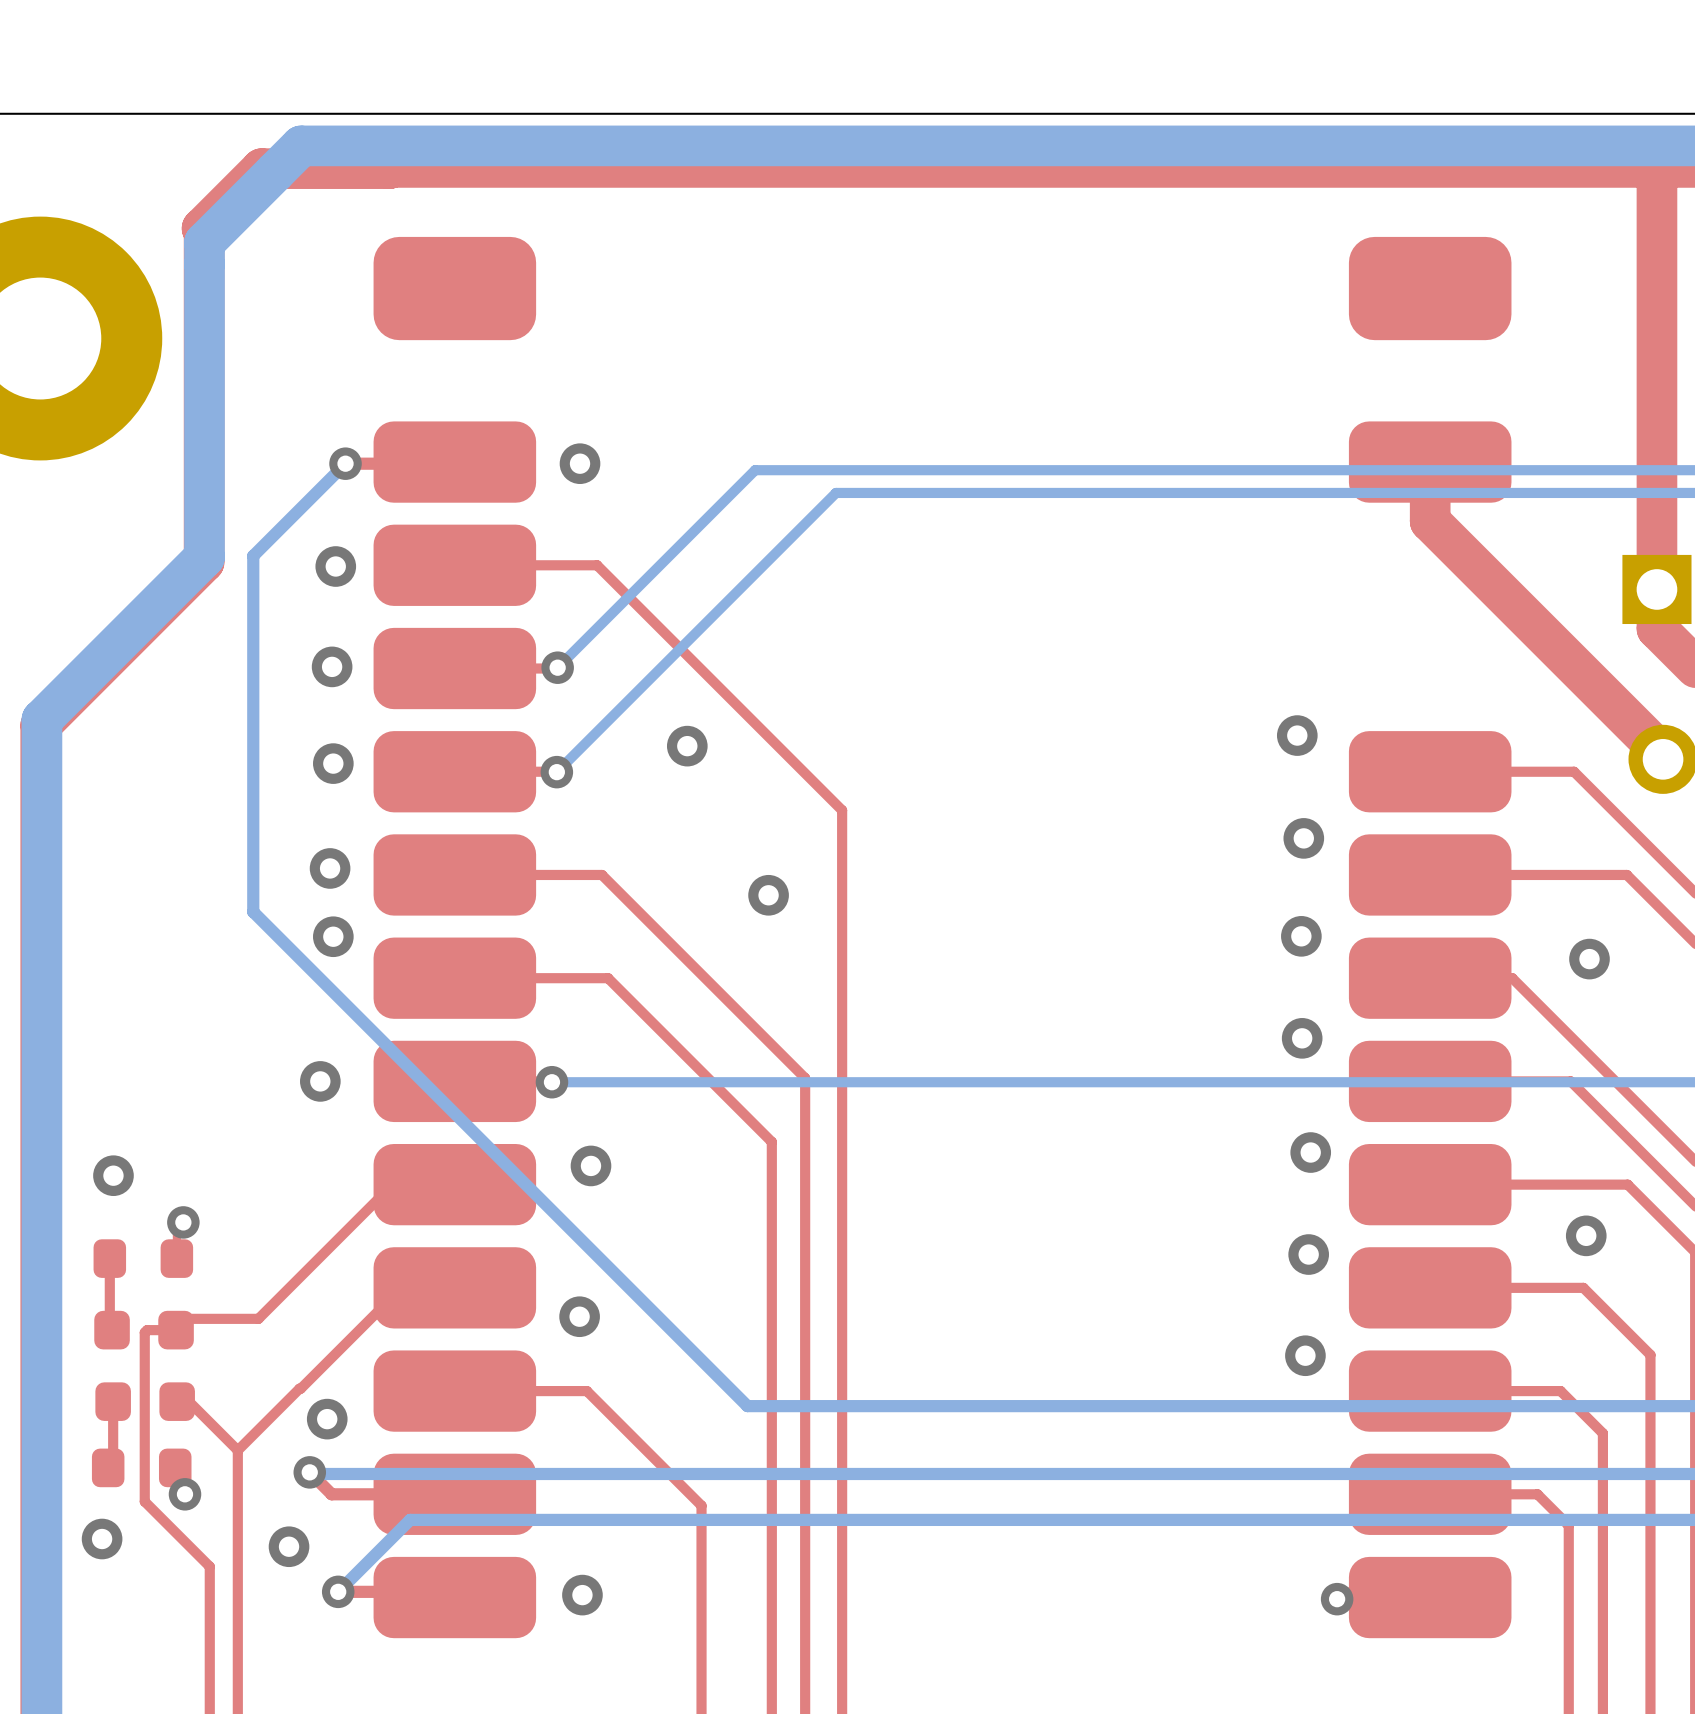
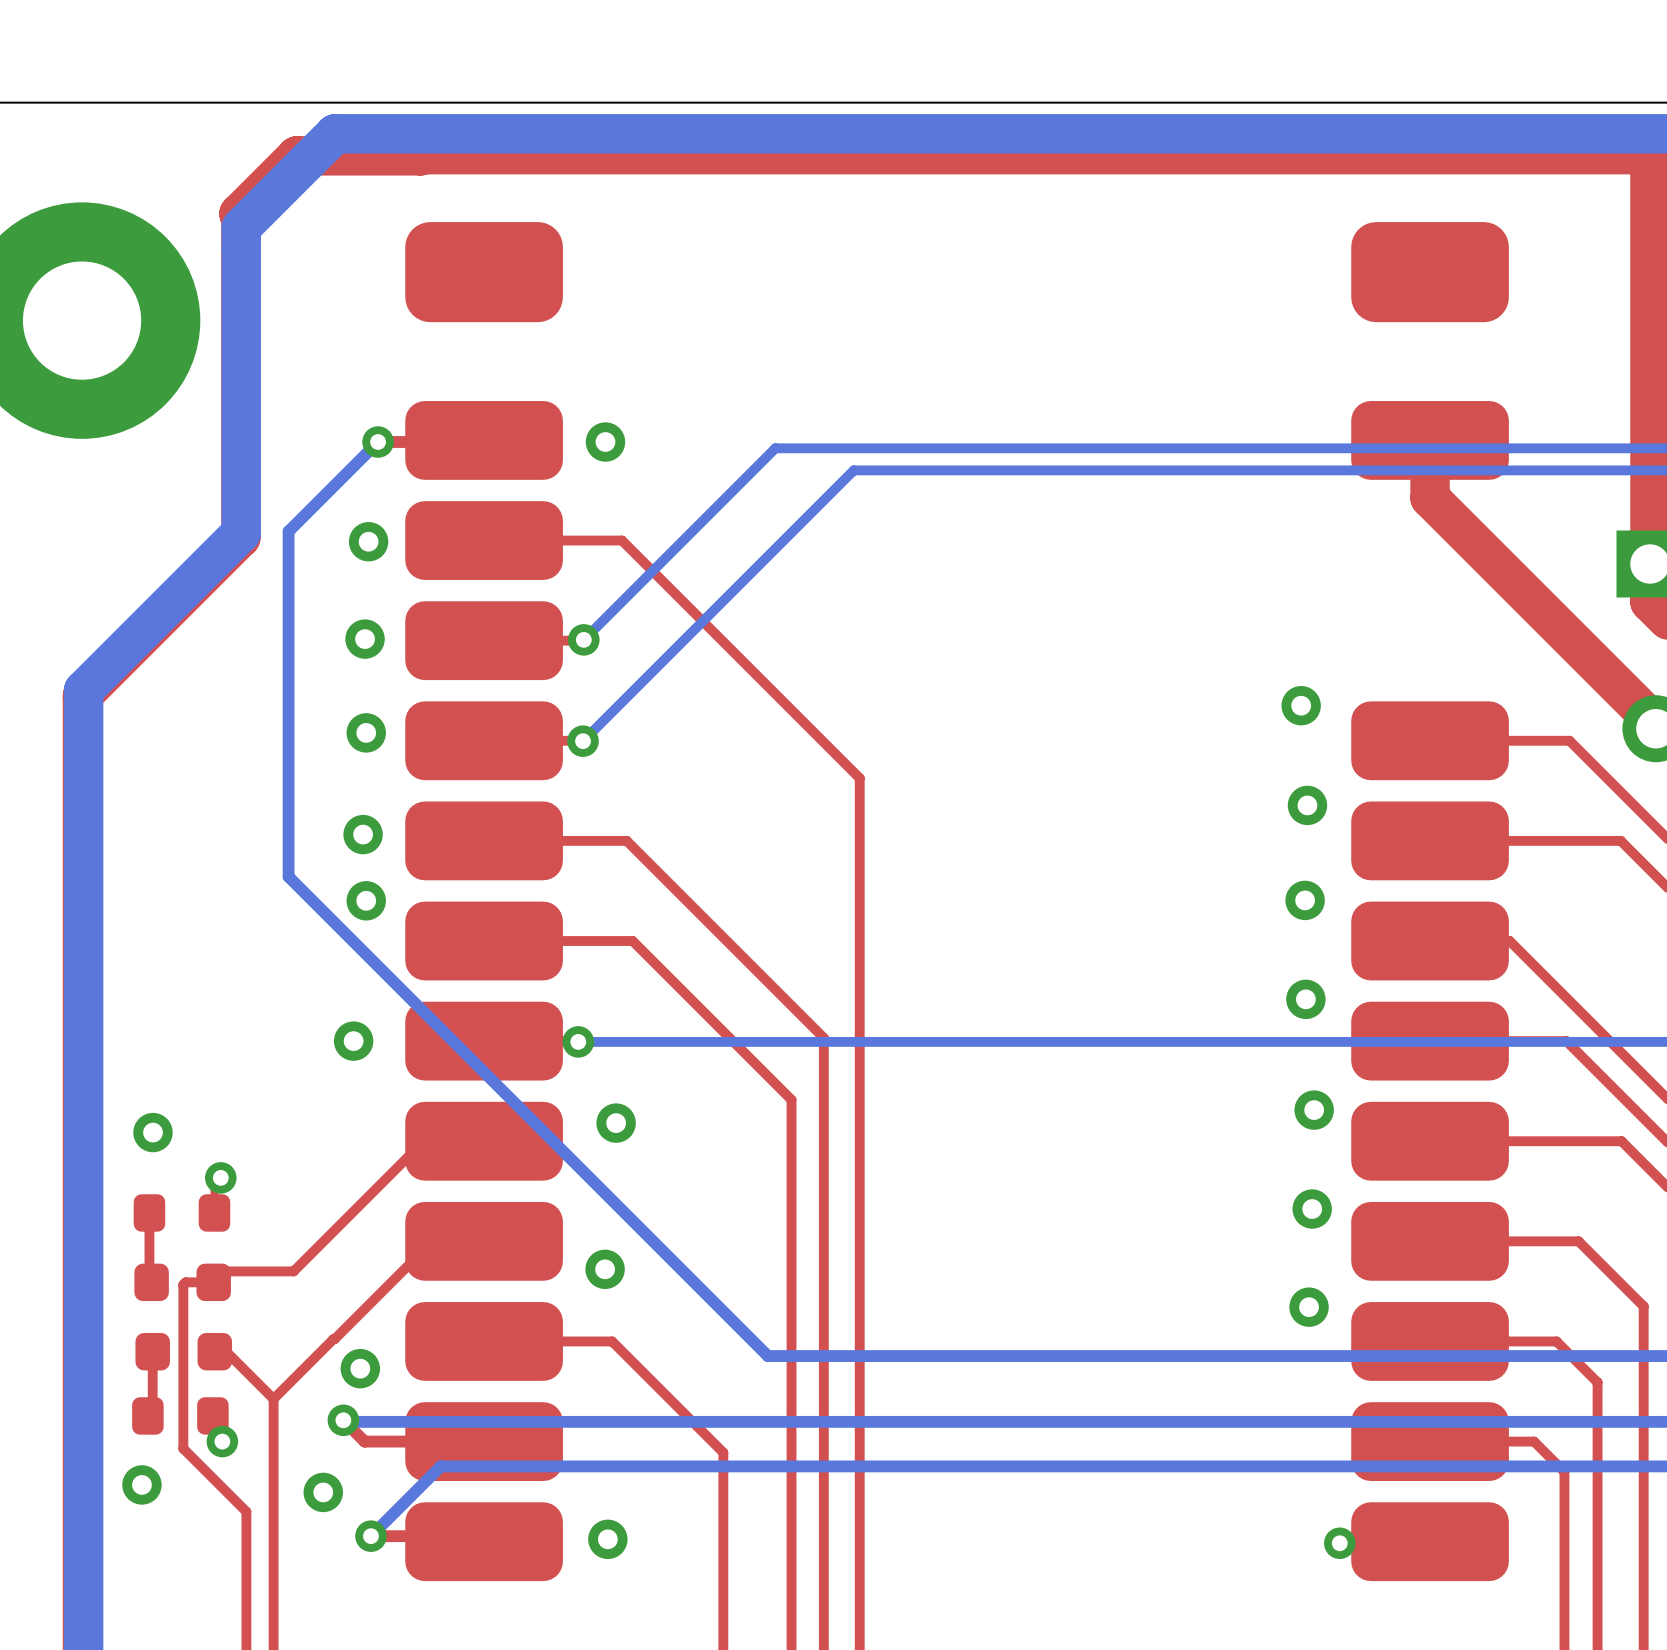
via: (687, 746) -> none
via: (768, 895) -> none
via: (1589, 959) -> none
via: (1586, 1235) -> none

